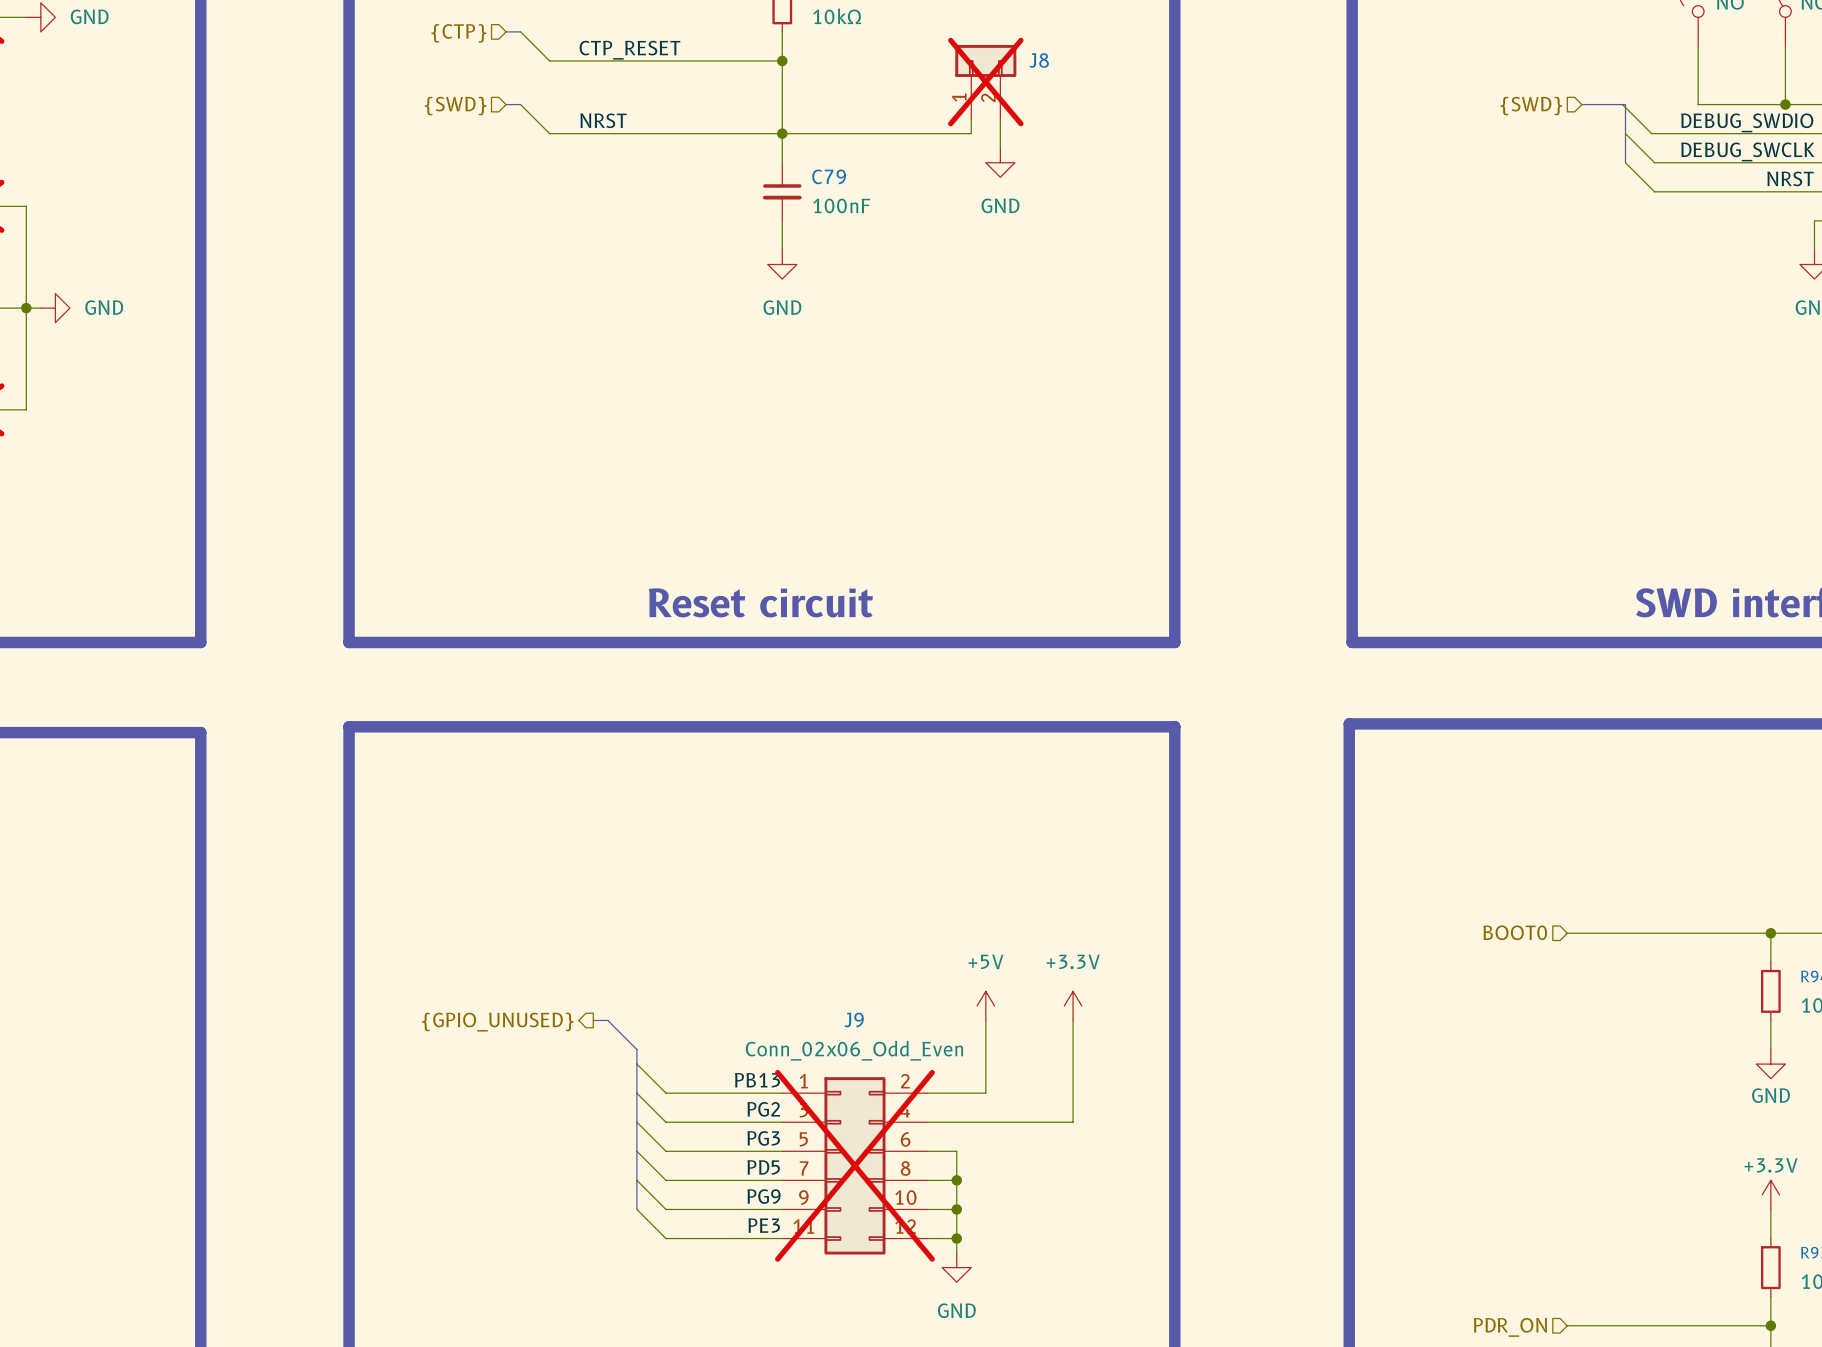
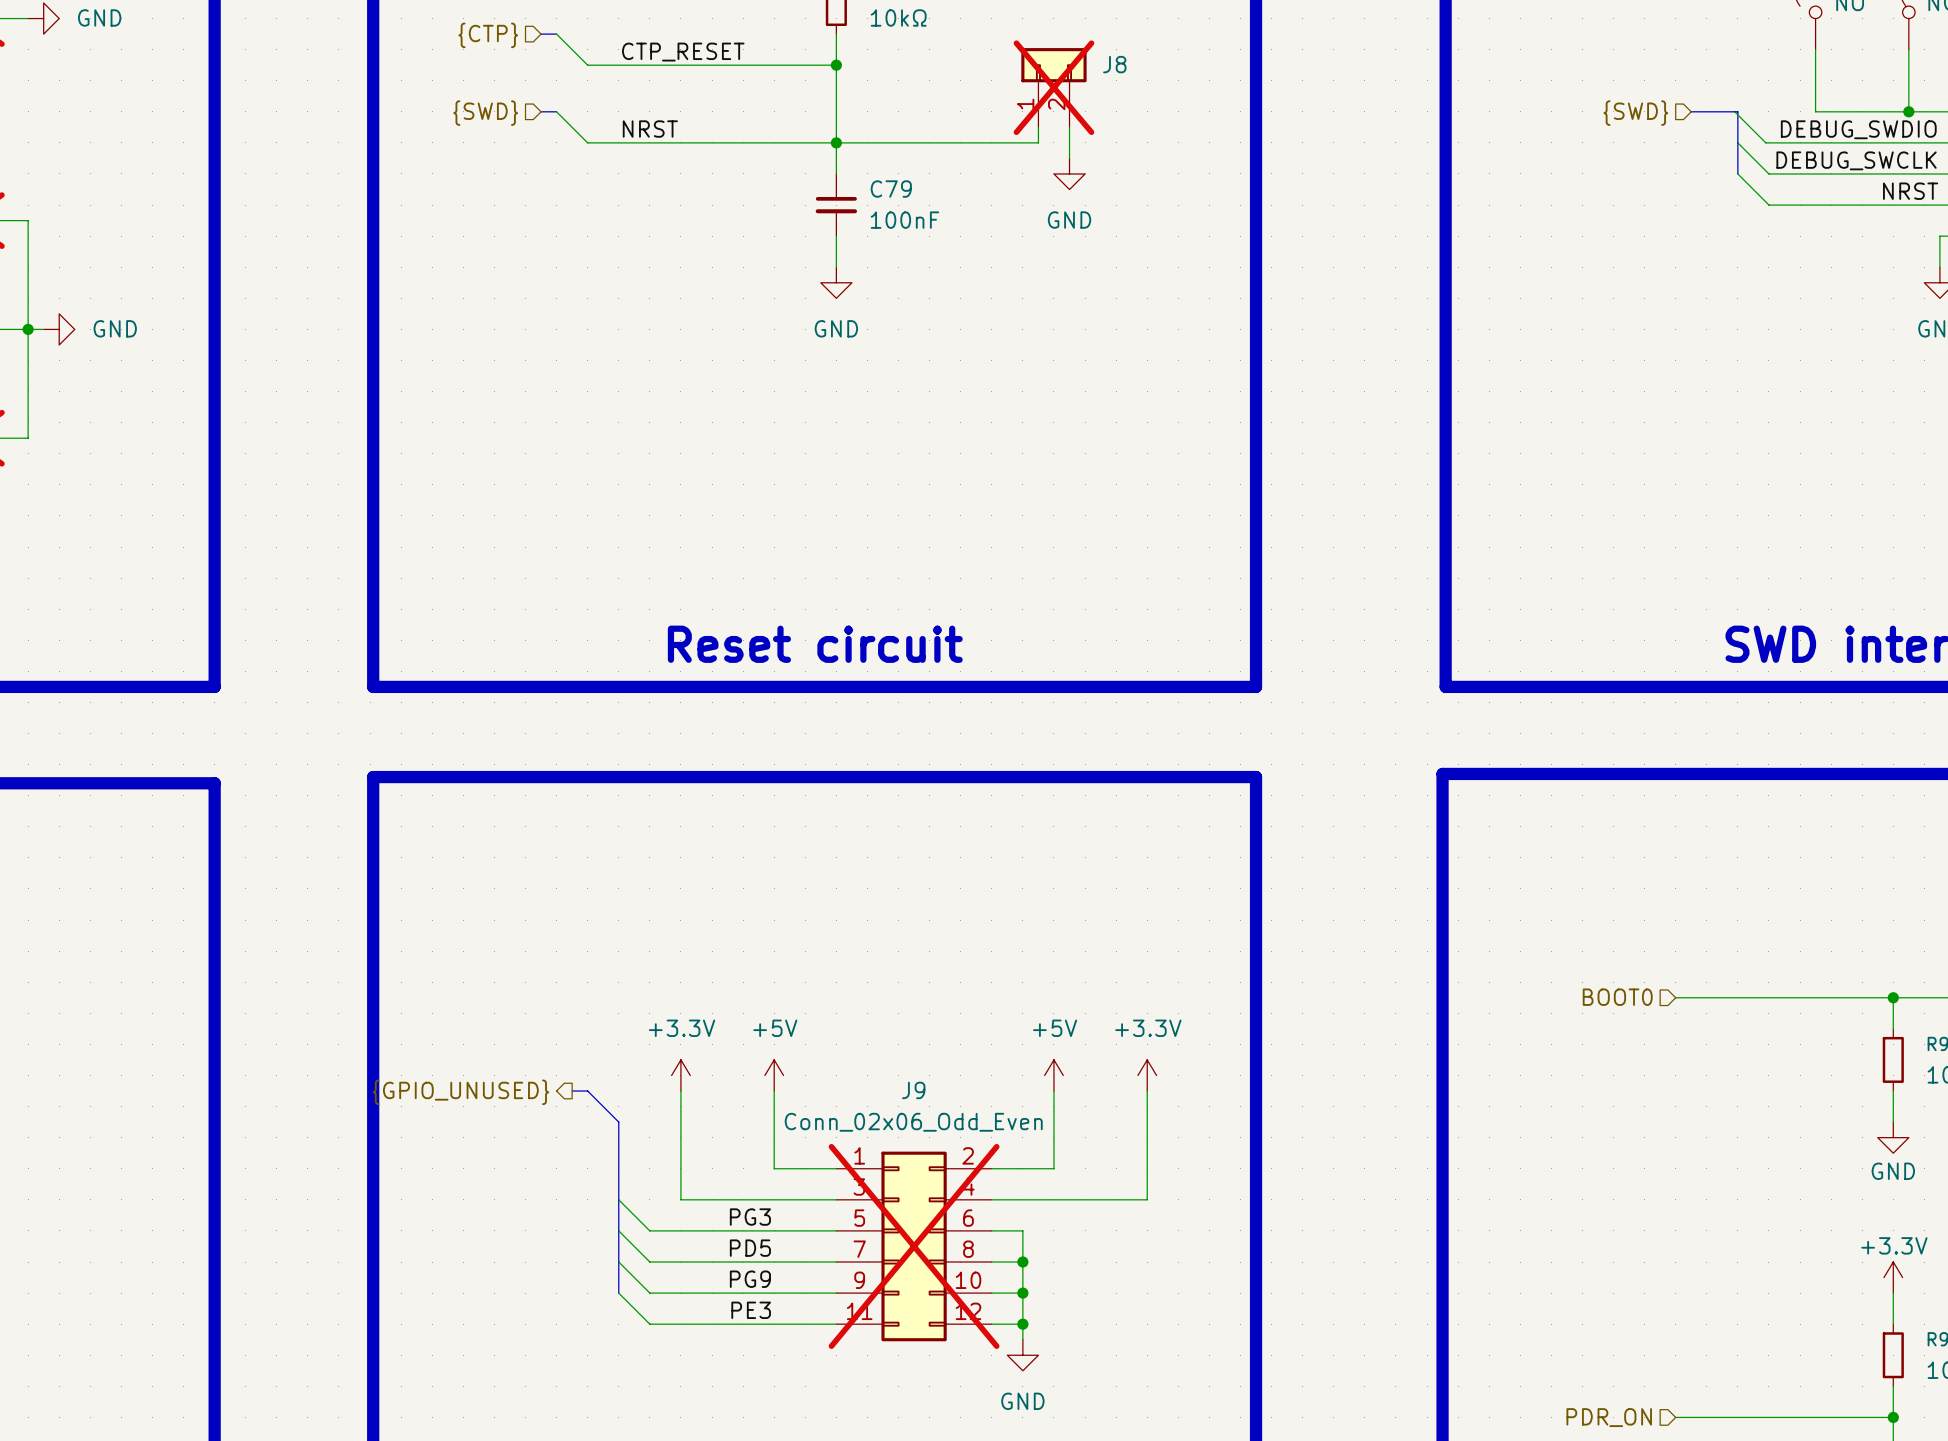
power symbol: none -> +3.3V (680, 1075)
power symbol: none -> +5V (774, 1075)
bus: (593, 1020) (607, 1020) (636, 1049) (636, 1209) -> (572, 1091) (587, 1091) (618, 1122) (618, 1293)
hierarchical label position: {GPIO_UNUSED} (497, 1022) -> {GPIO_UNUSED} (460, 1092)
wire: (636, 1064) (665, 1093) (724, 1093) -> (774, 1091) (774, 1168)
label: PB13 (757, 1080) -> none
wire: (636, 1093) (665, 1122) -> (680, 1091) (680, 1199) (712, 1199)
label: PG2 (763, 1109) -> none
wire: (636, 1122) (665, 1151) -> (618, 1199) (649, 1230) (712, 1230)
label position: PG3 (763, 1138) -> PG3 (750, 1217)
wire: (636, 1151) (665, 1180) -> (618, 1230) (649, 1262) (712, 1262)
label position: PD5 (763, 1167) -> PD5 (750, 1248)
wire: (636, 1180) (665, 1209) -> (618, 1262) (649, 1293) (712, 1293)
label position: PG9 (764, 1196) -> PG9 (750, 1279)
wire: (636, 1209) (665, 1238) -> (618, 1293) (649, 1324) (712, 1324)
label position: PE3 (764, 1225) -> PE3 (751, 1310)

